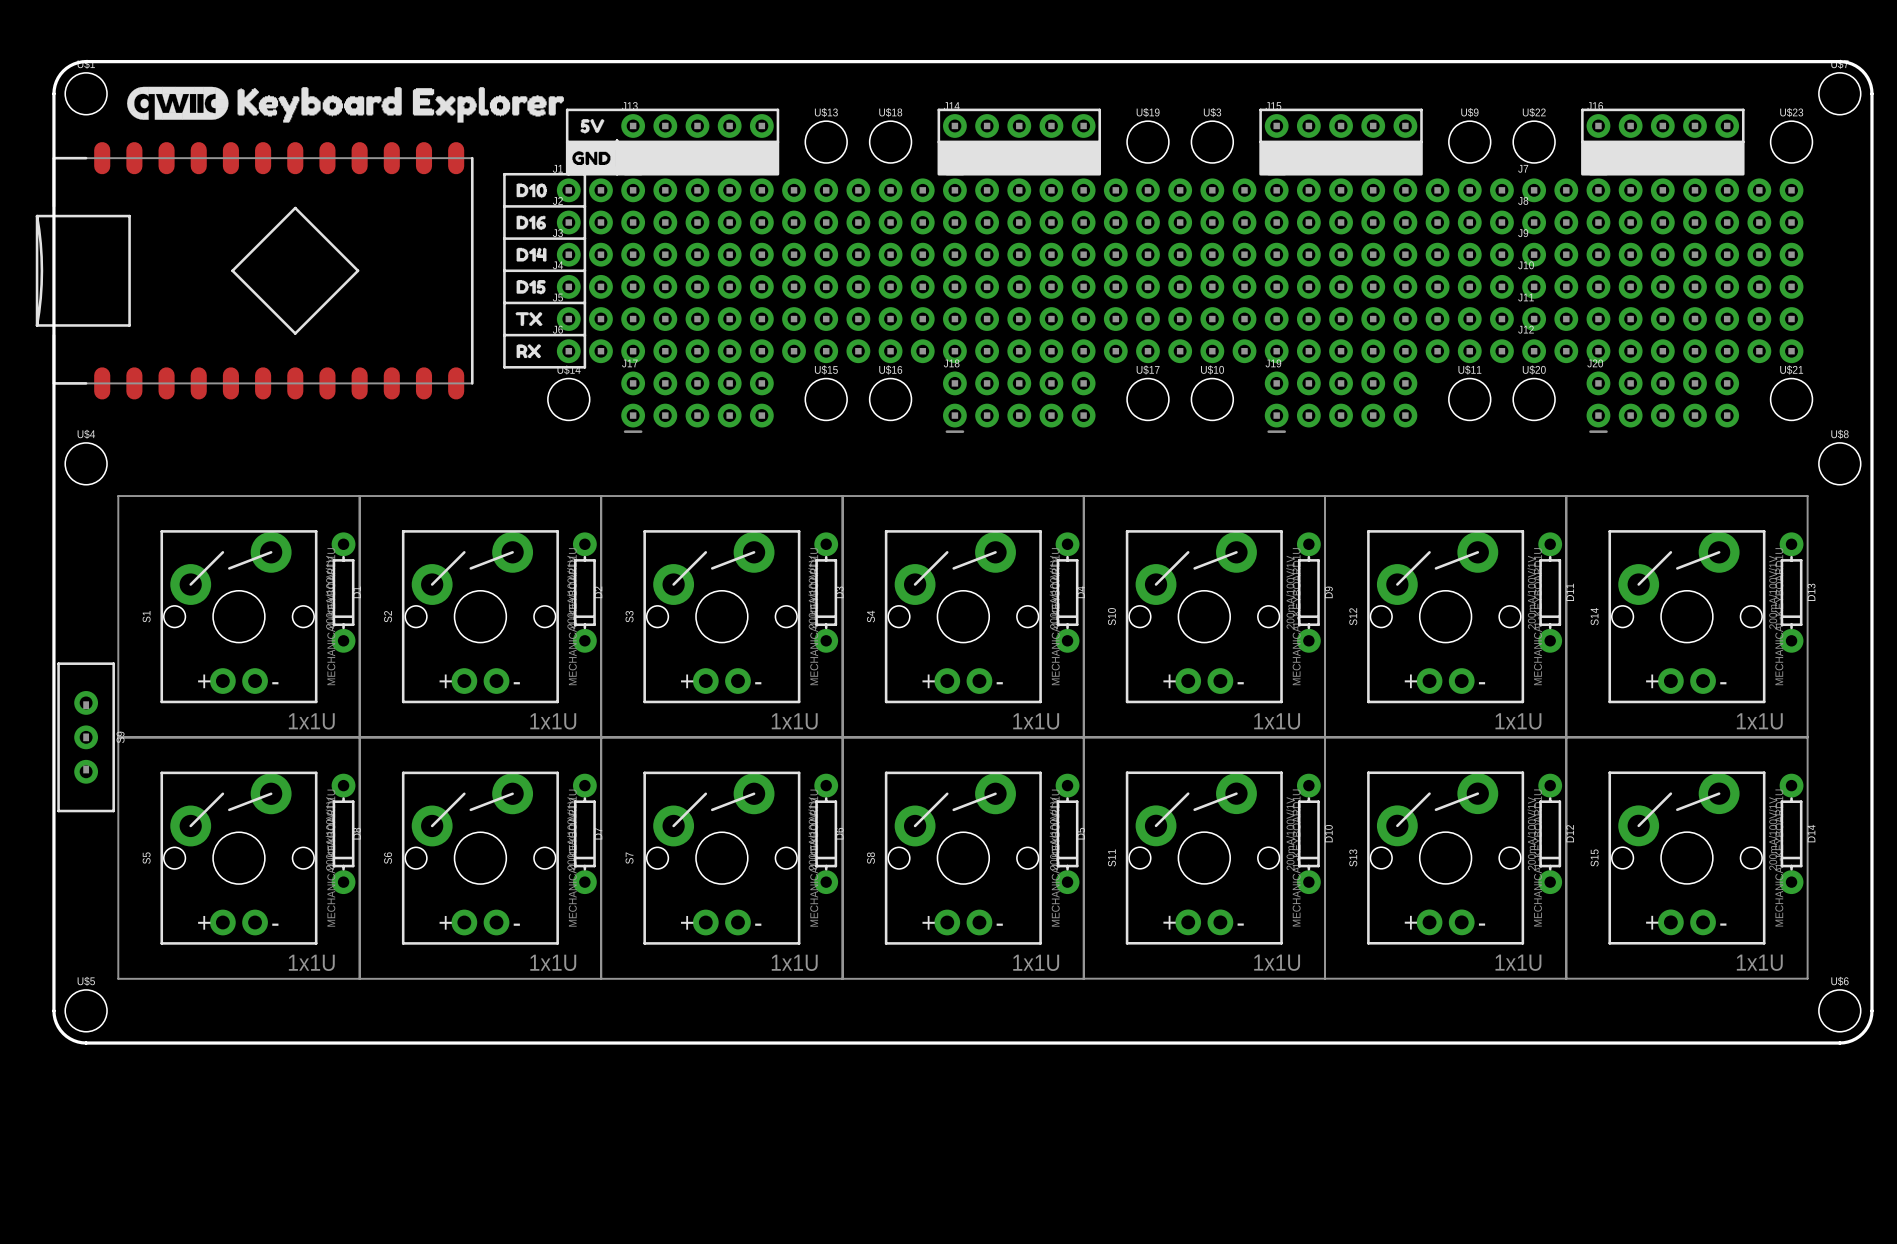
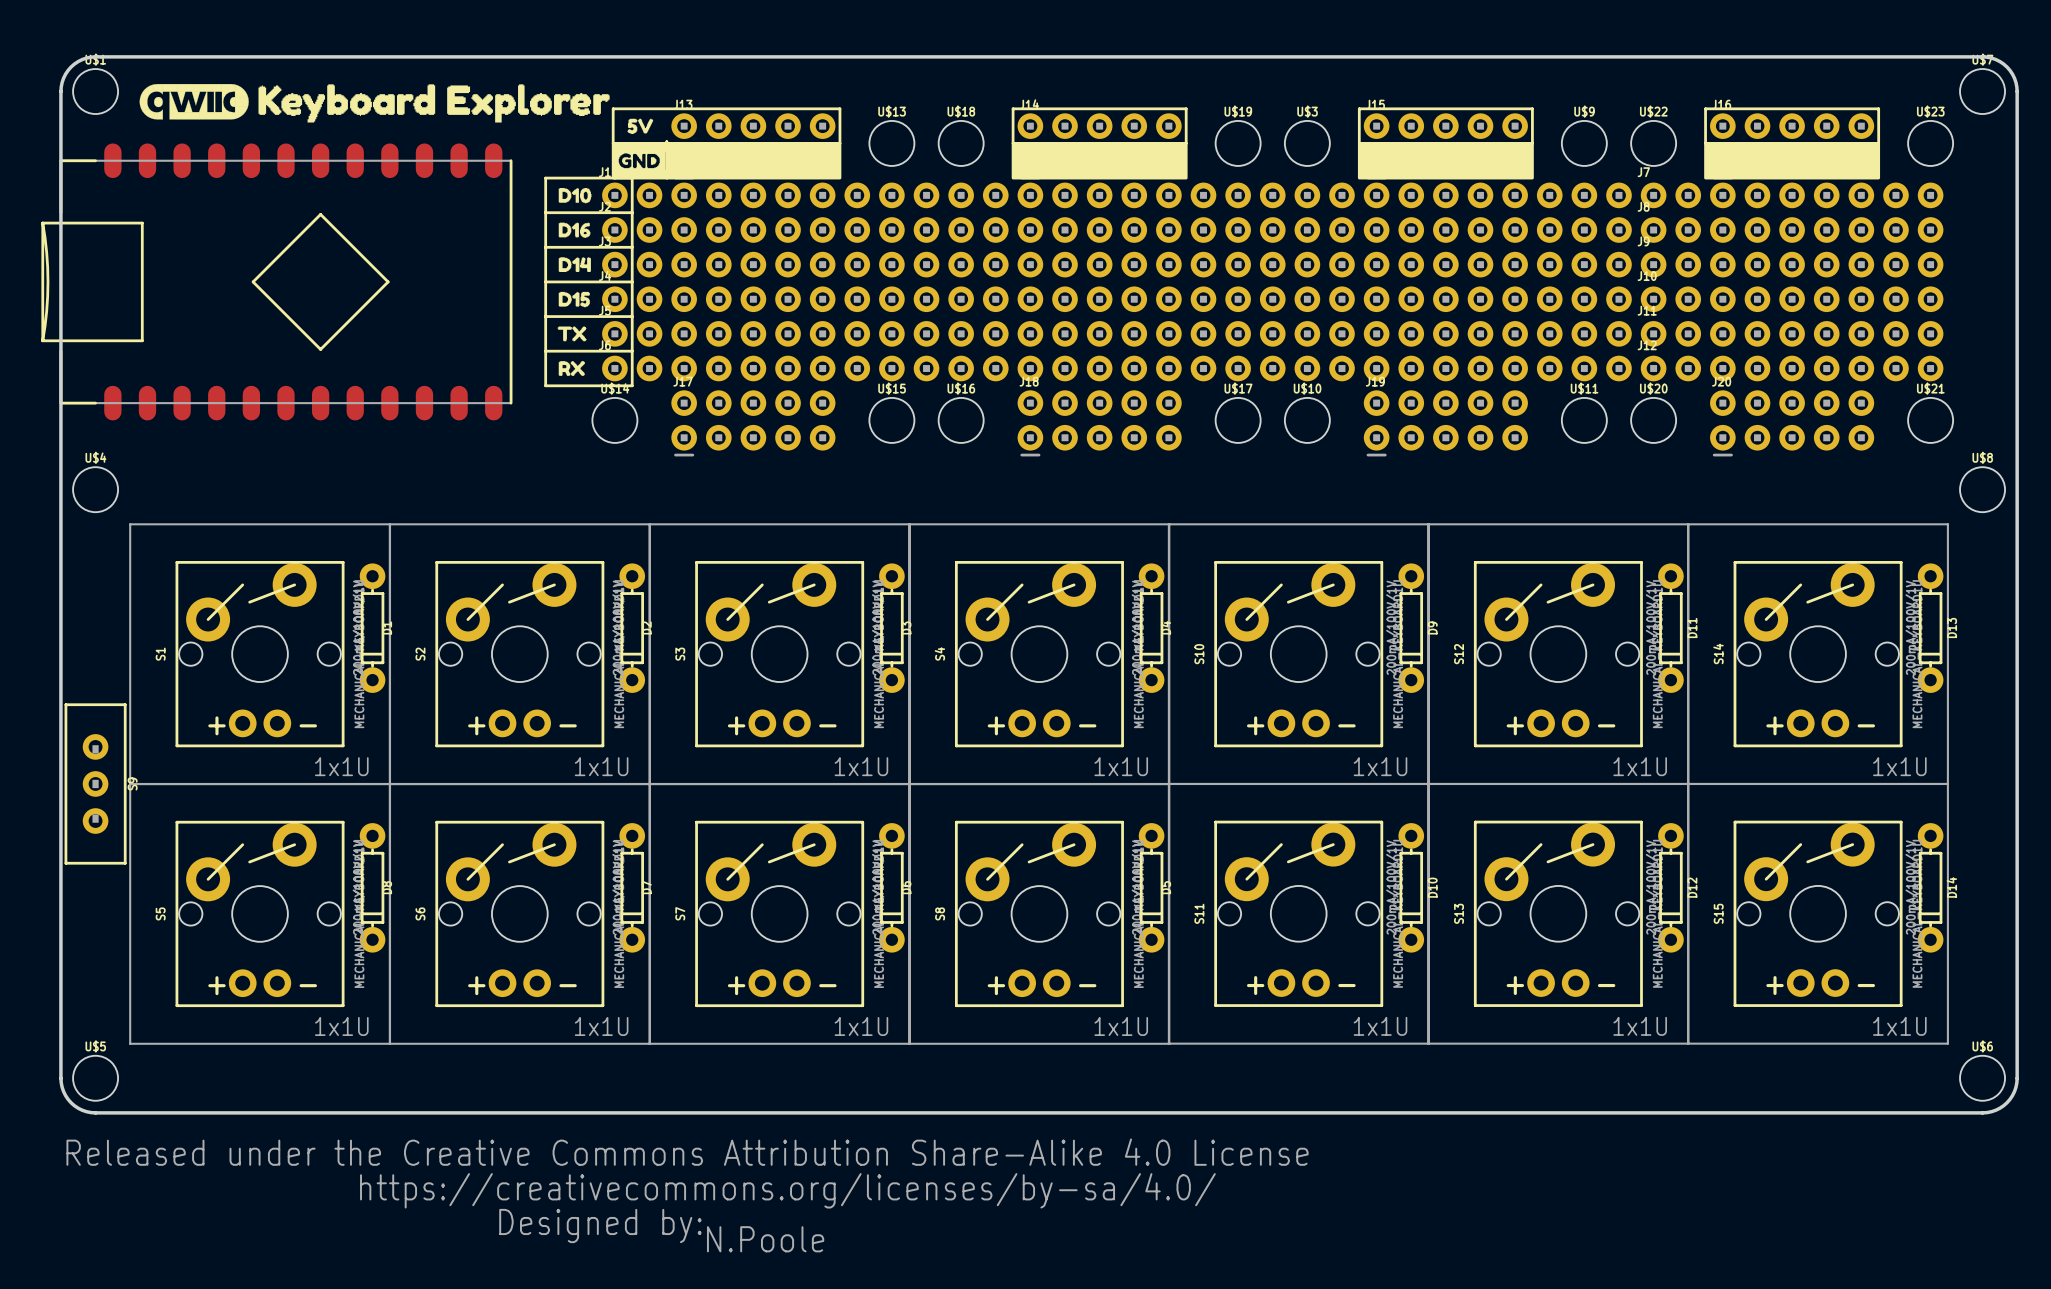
drawing: none -> [66, 1138, 1309, 1244]
text: none -> N.Poole (765, 1239)

